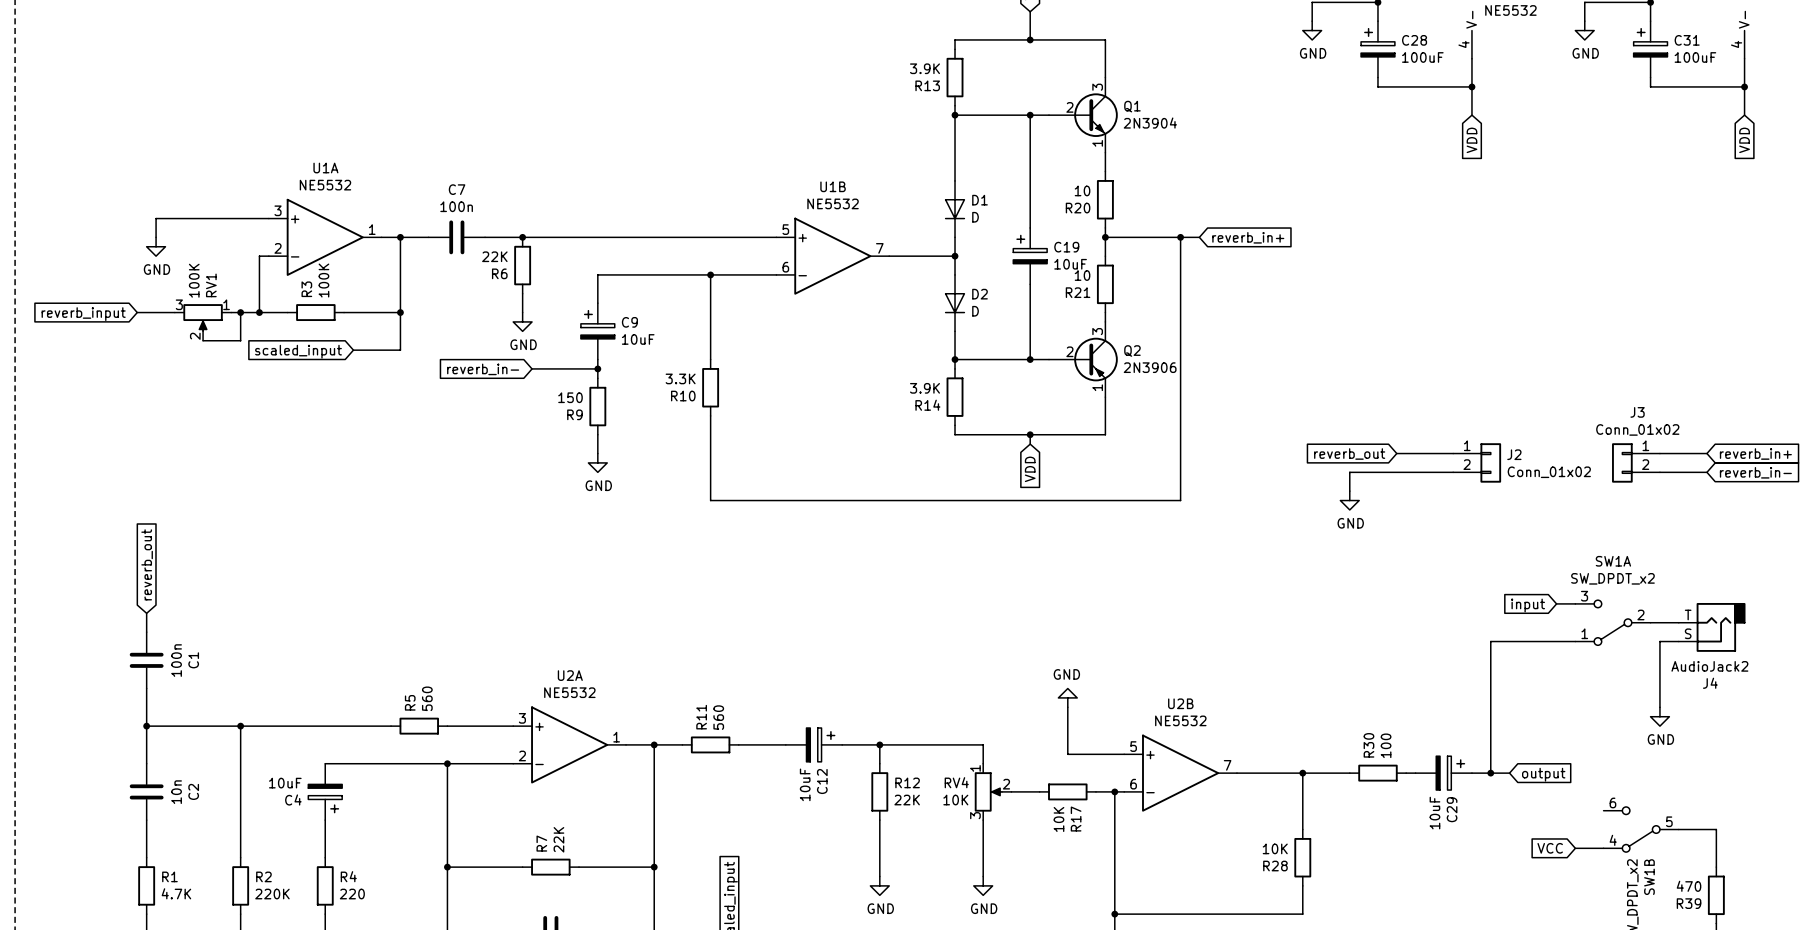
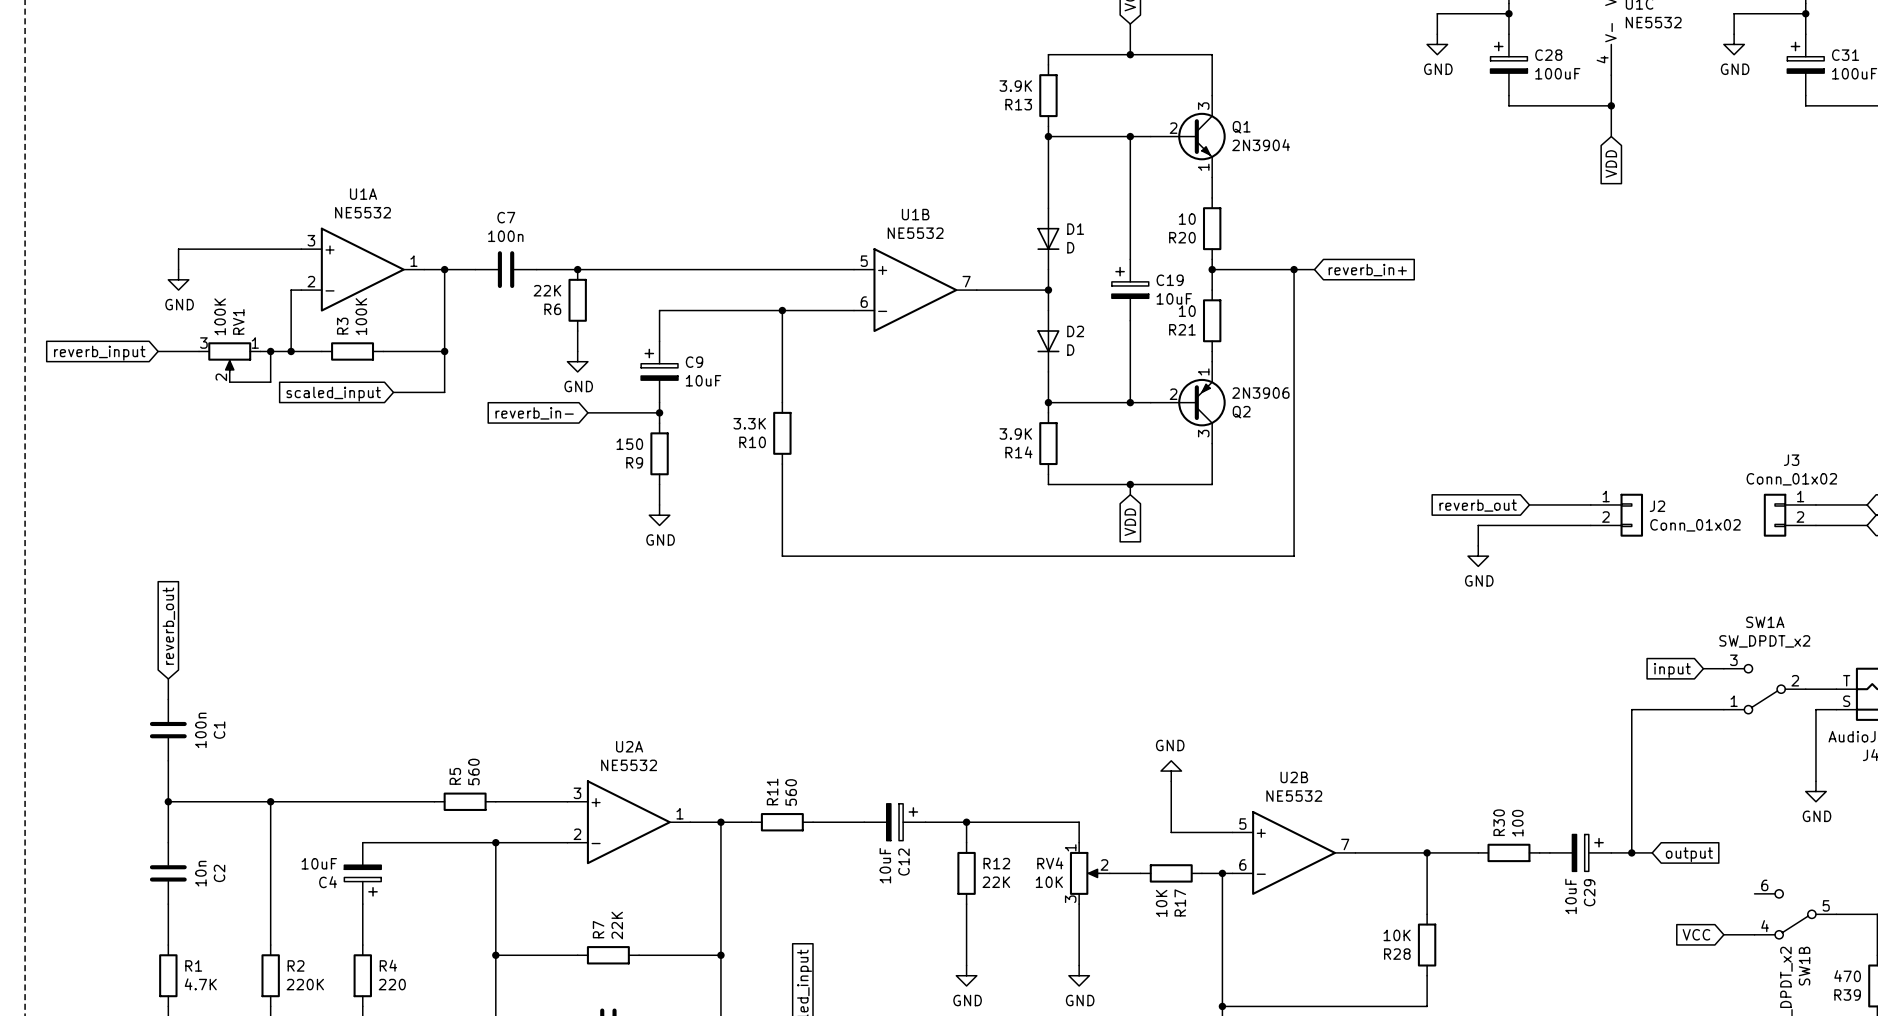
Q2 flip: as is (1096, 359) -> up-down (1201, 402)

